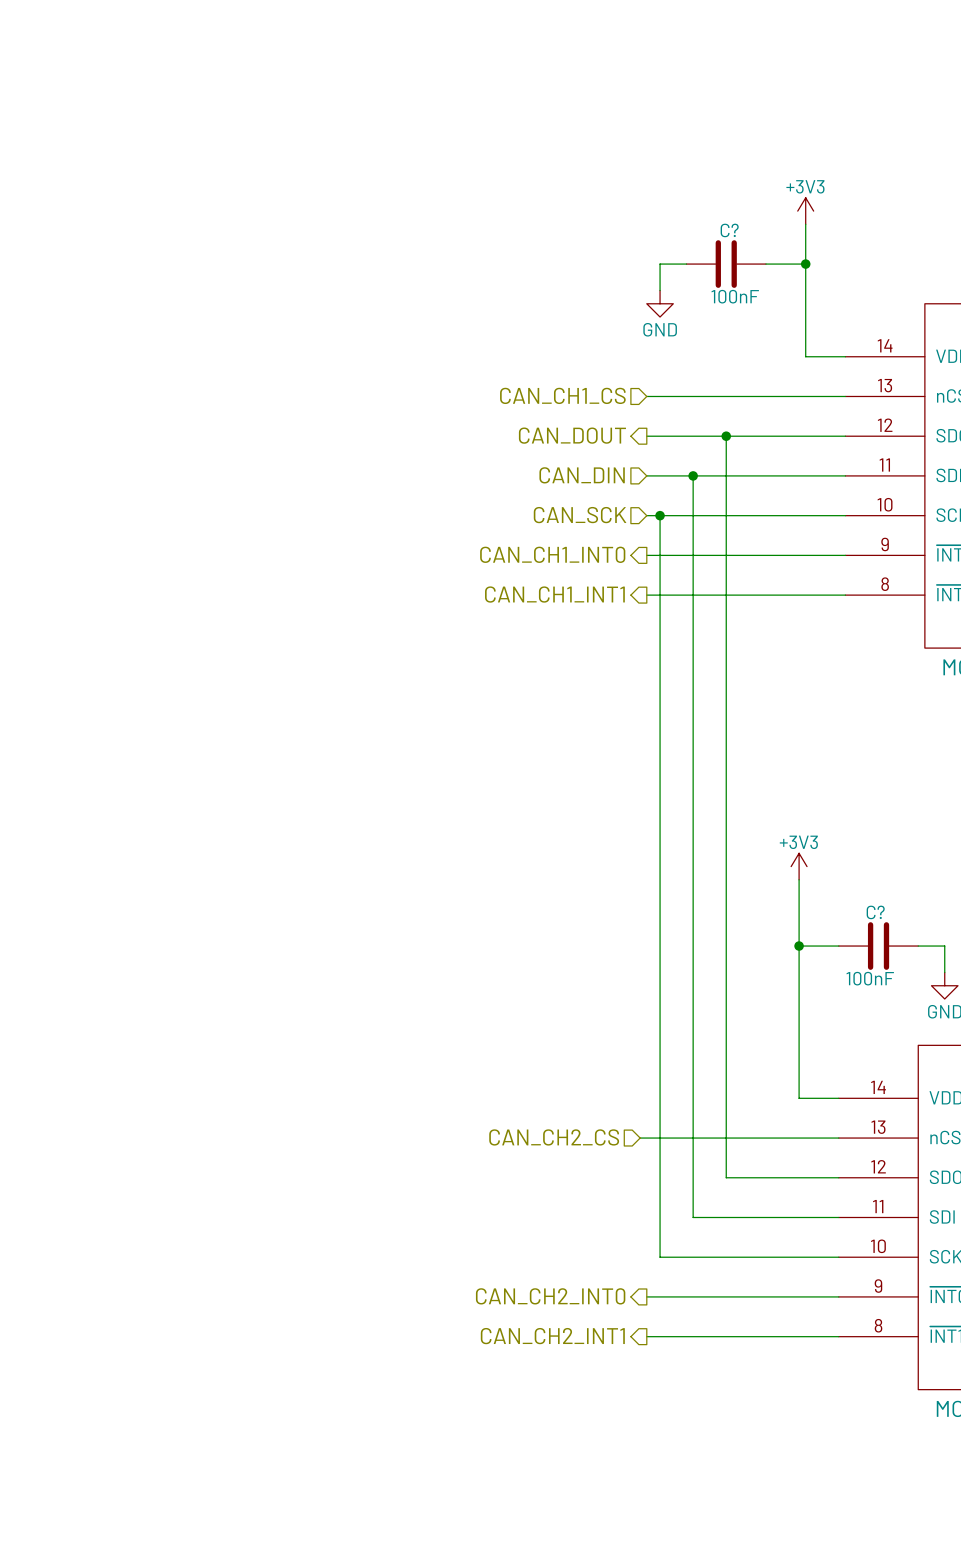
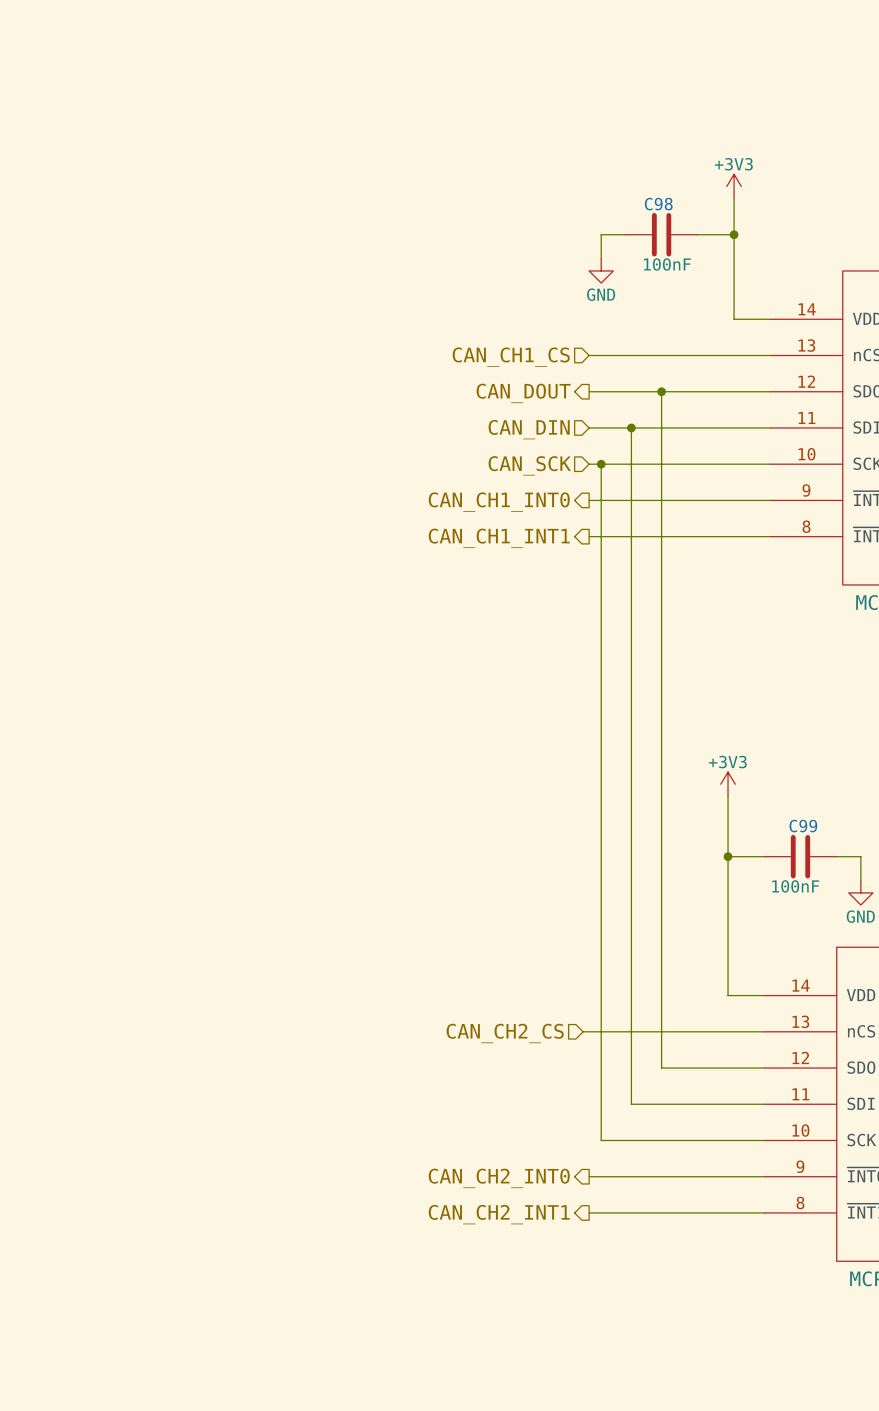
C? name: C? (729, 230) -> C98 (658, 204)
C? name: C? (875, 912) -> C99 (803, 826)

